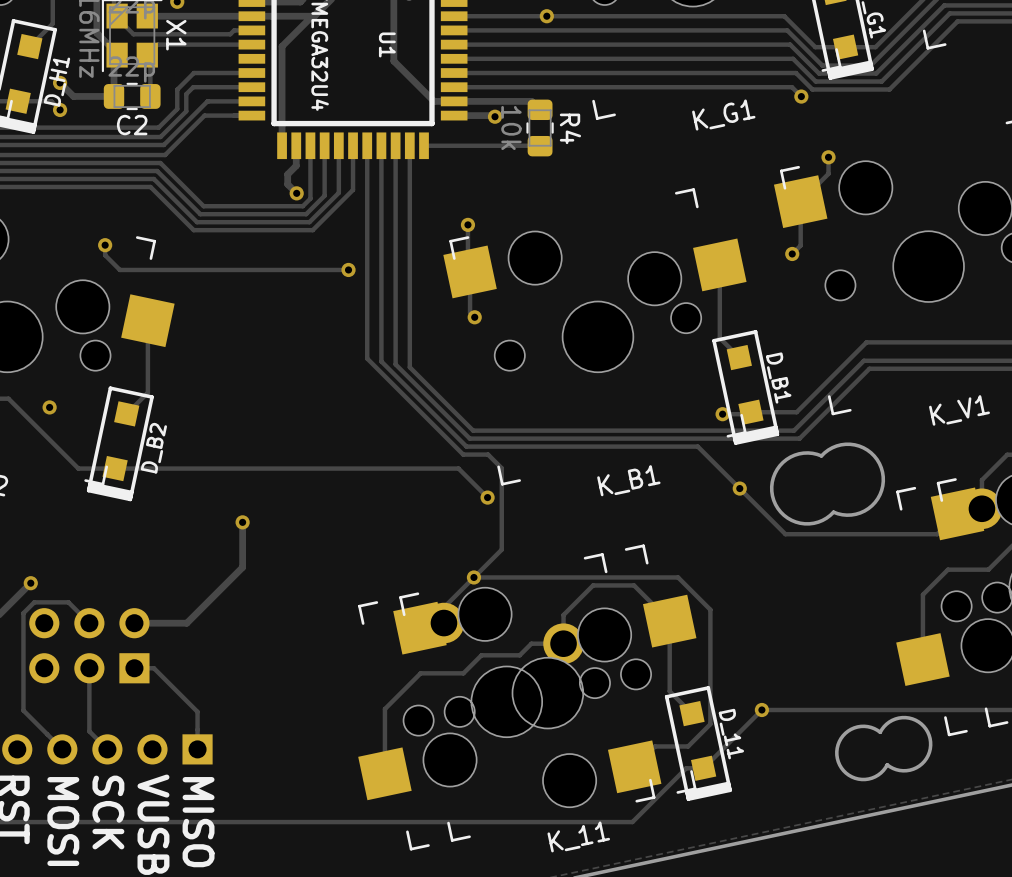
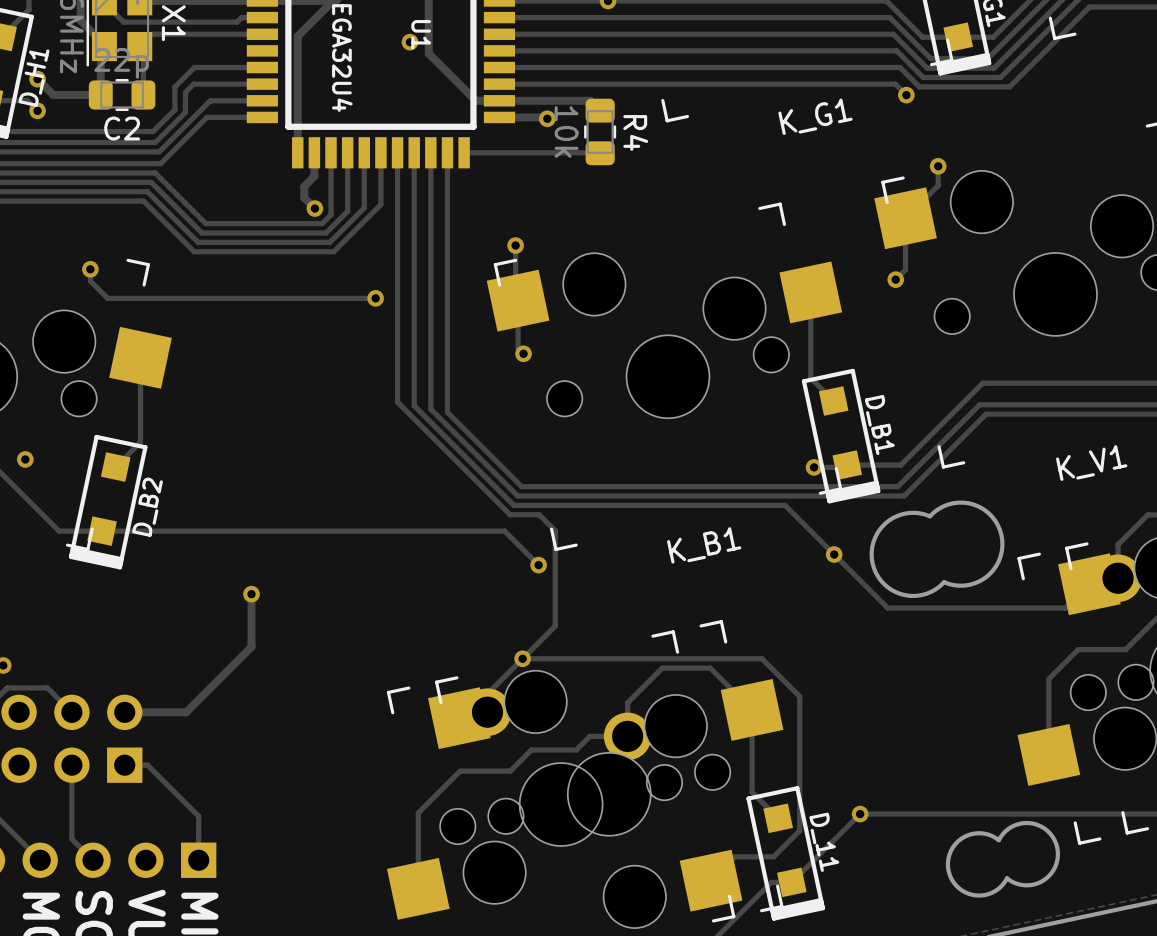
via: none -> (409, 42)

